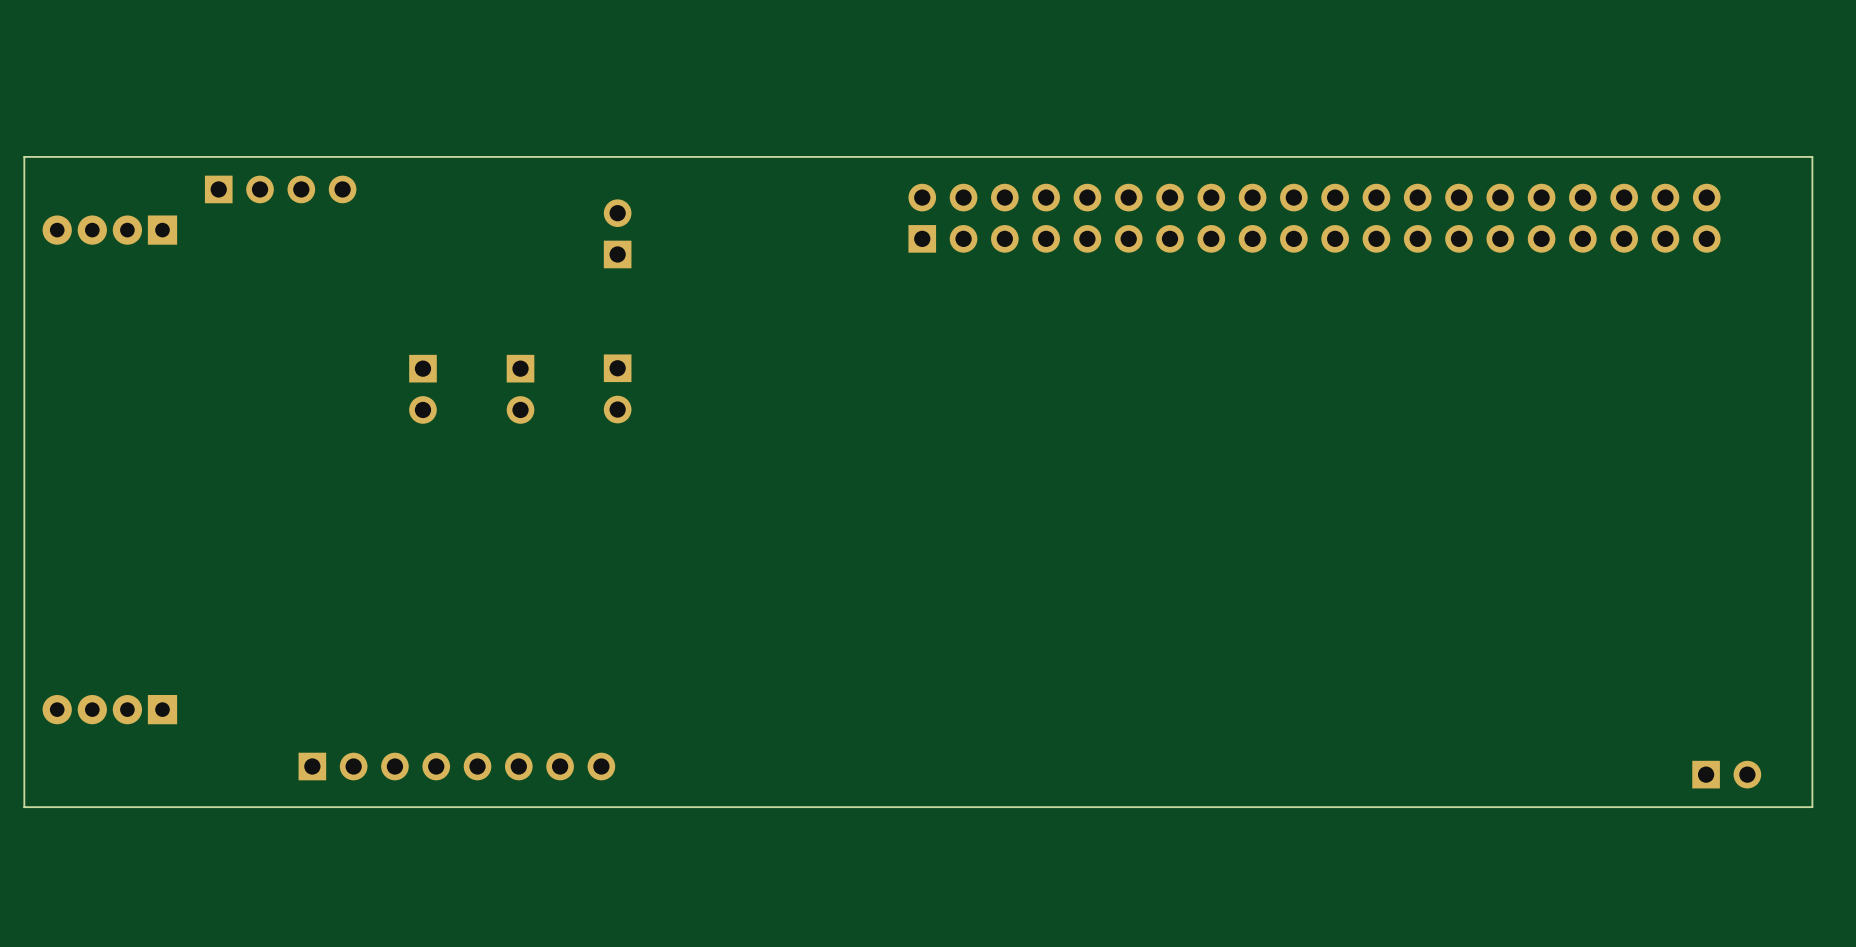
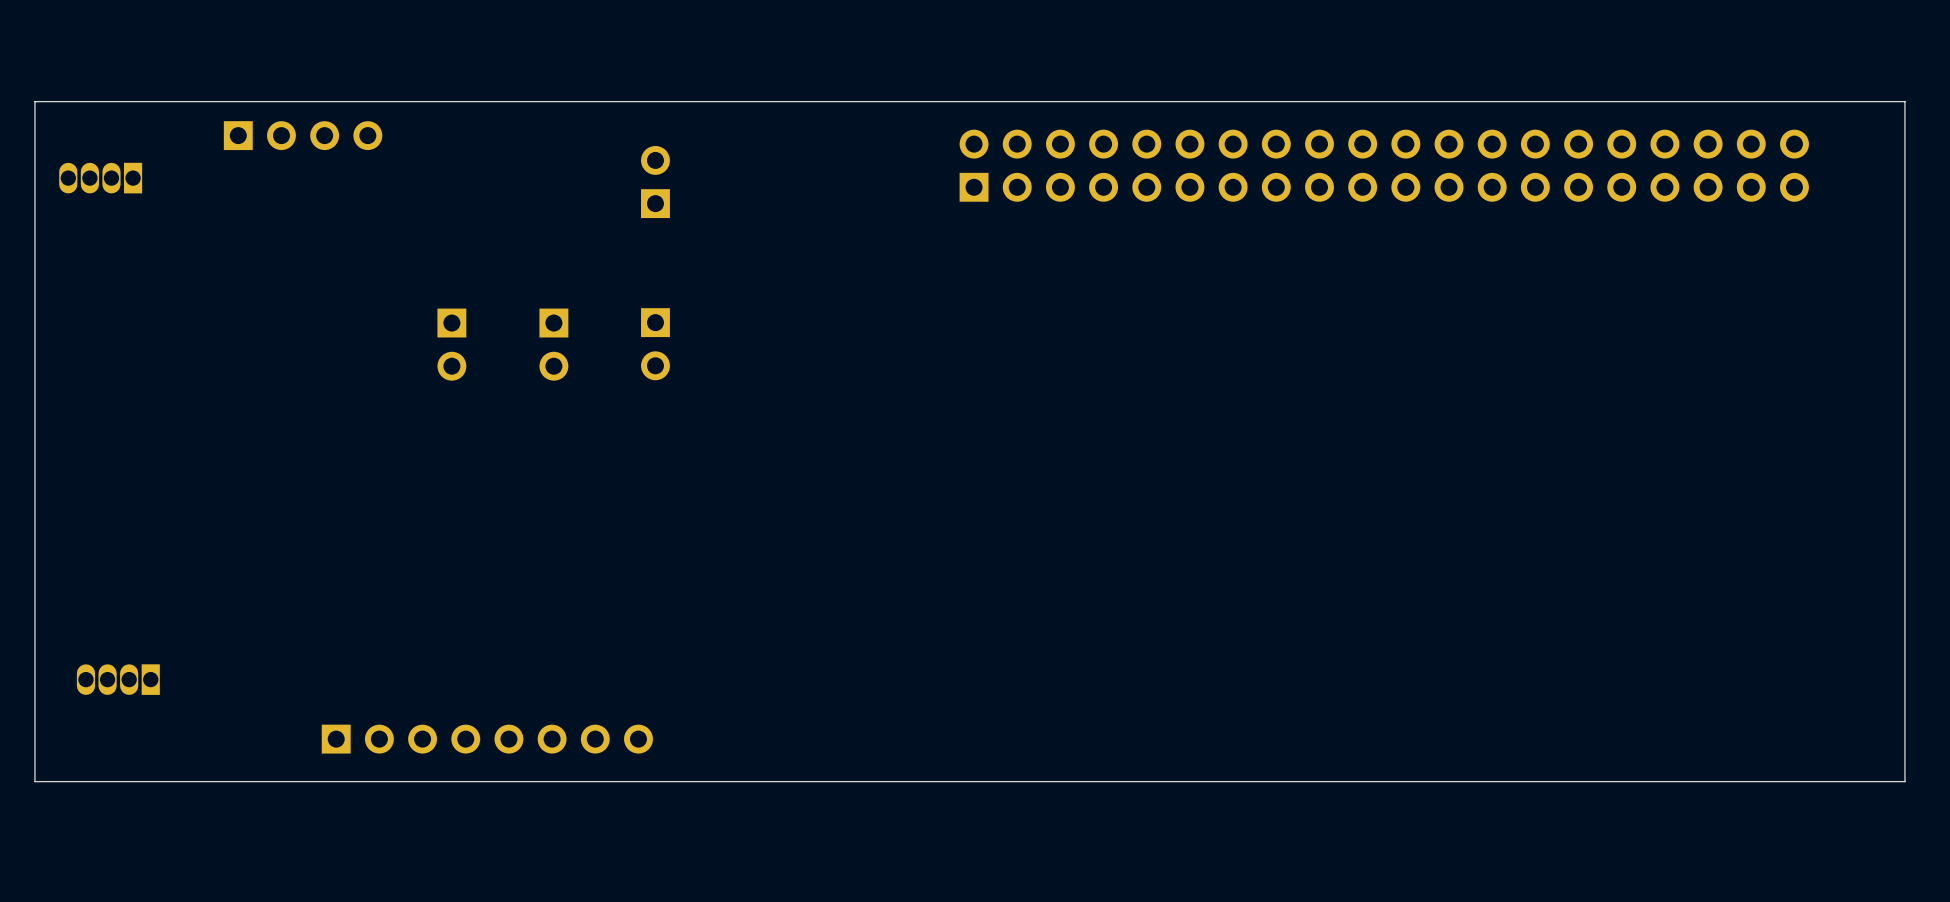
part: none -> (100, 178)
part: (109, 230) -> none
part footprint: [42, 694, 178, 725] -> [76, 664, 160, 695]
part: (1726, 774) -> none

